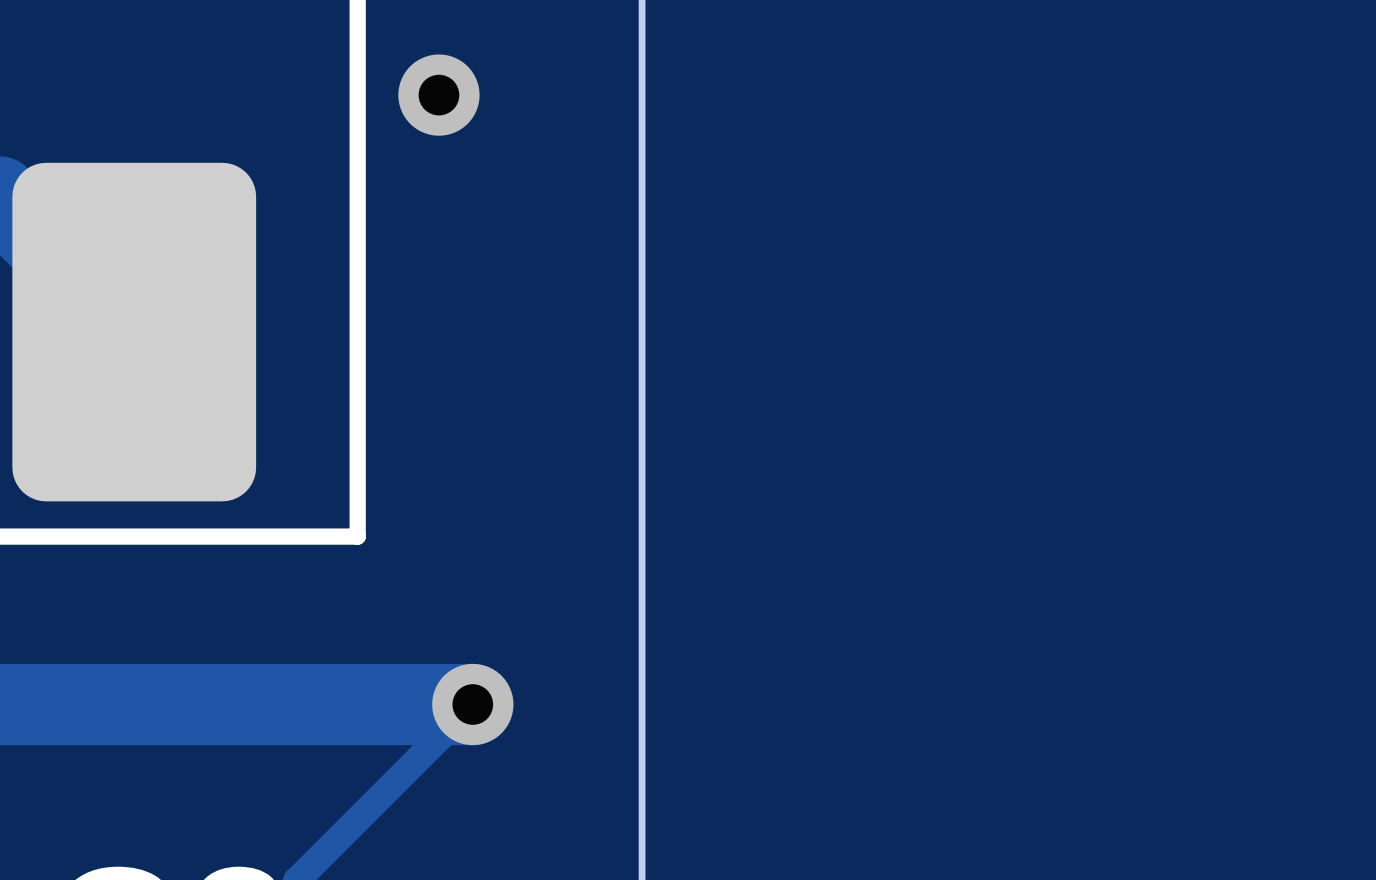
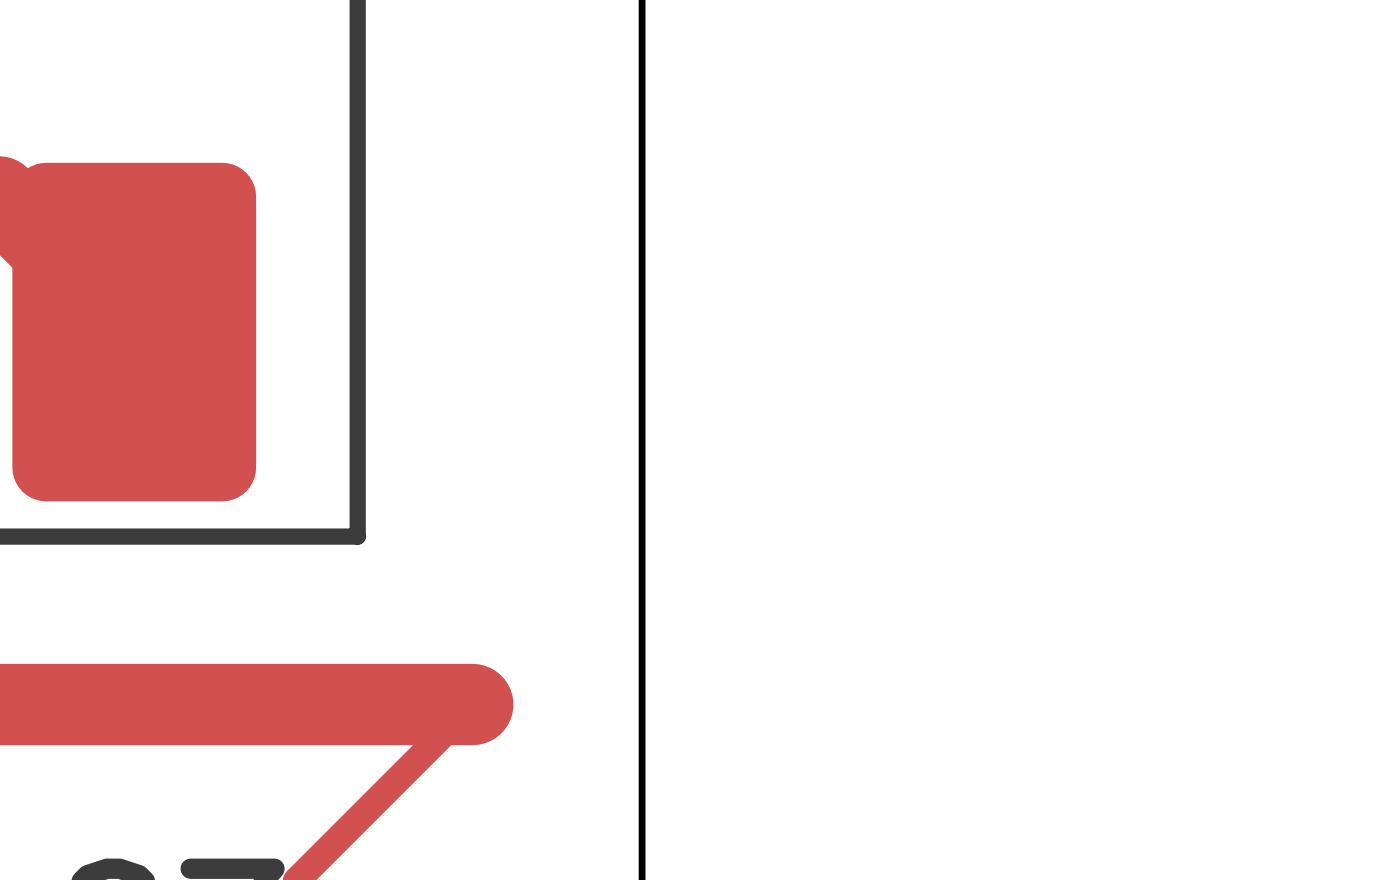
via: (438, 95) -> none
via: (472, 704) -> none

